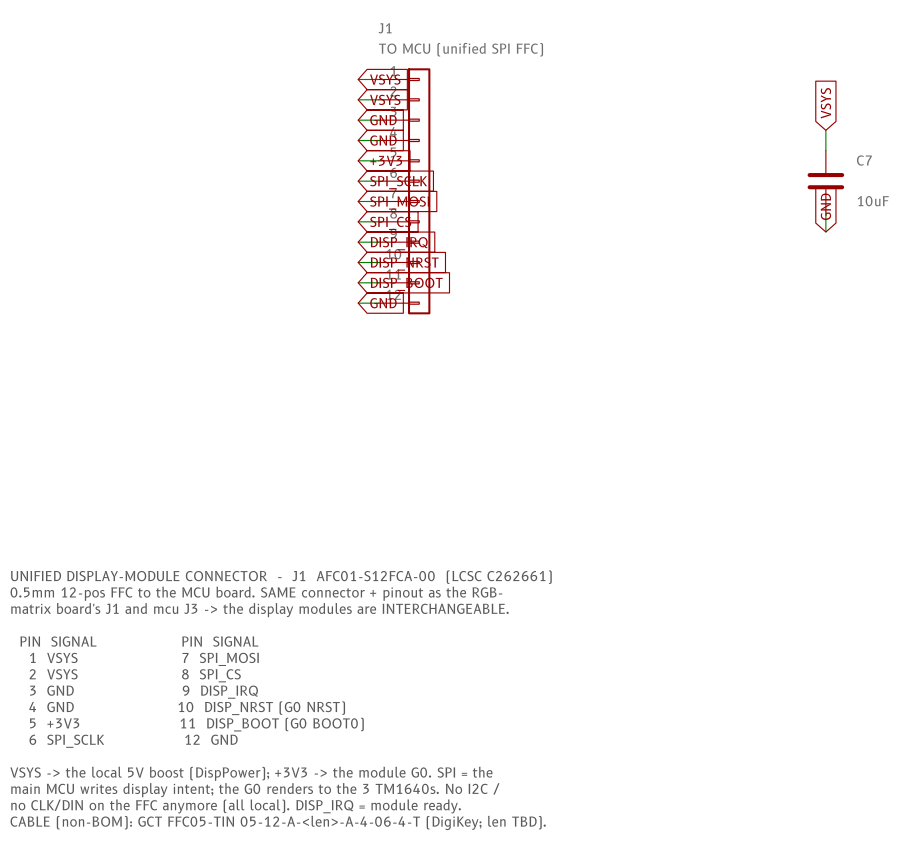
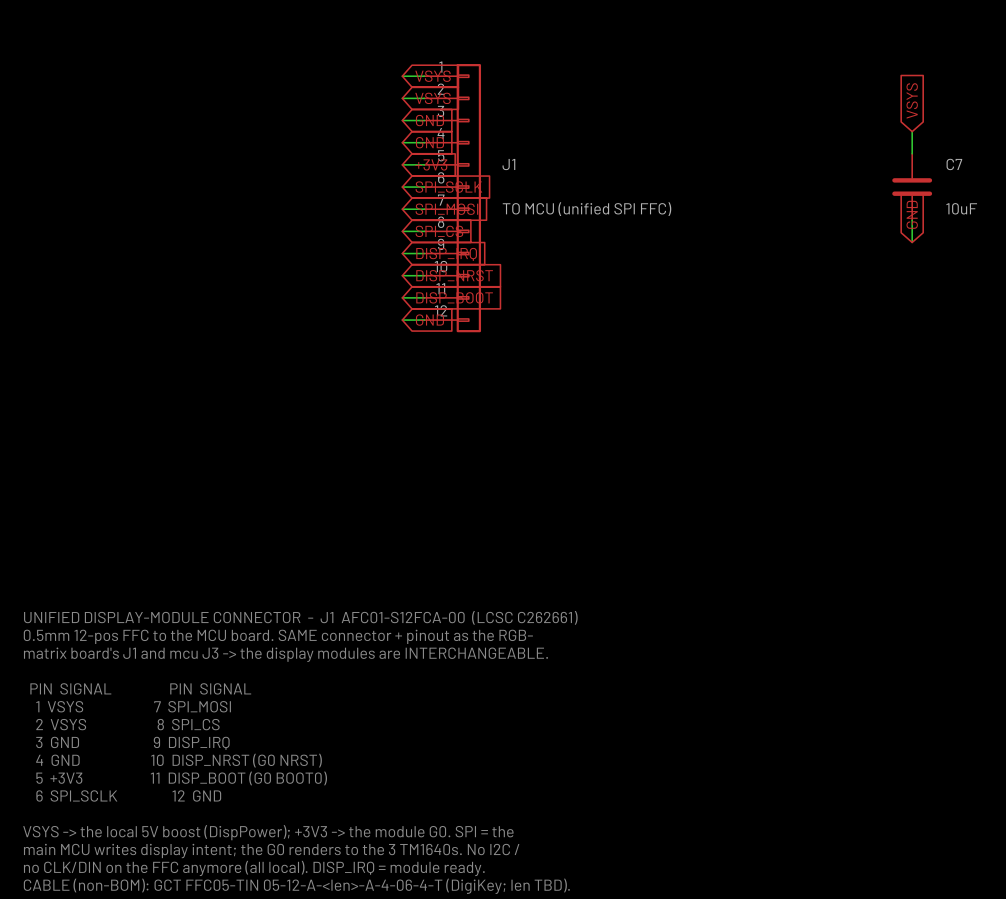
J1 name position: J1 (385, 28) -> J1 (508, 164)
J1 value position: TO MCU (unified SPI FFC) (461, 49) -> TO MCU (unified SPI FFC) (587, 209)

